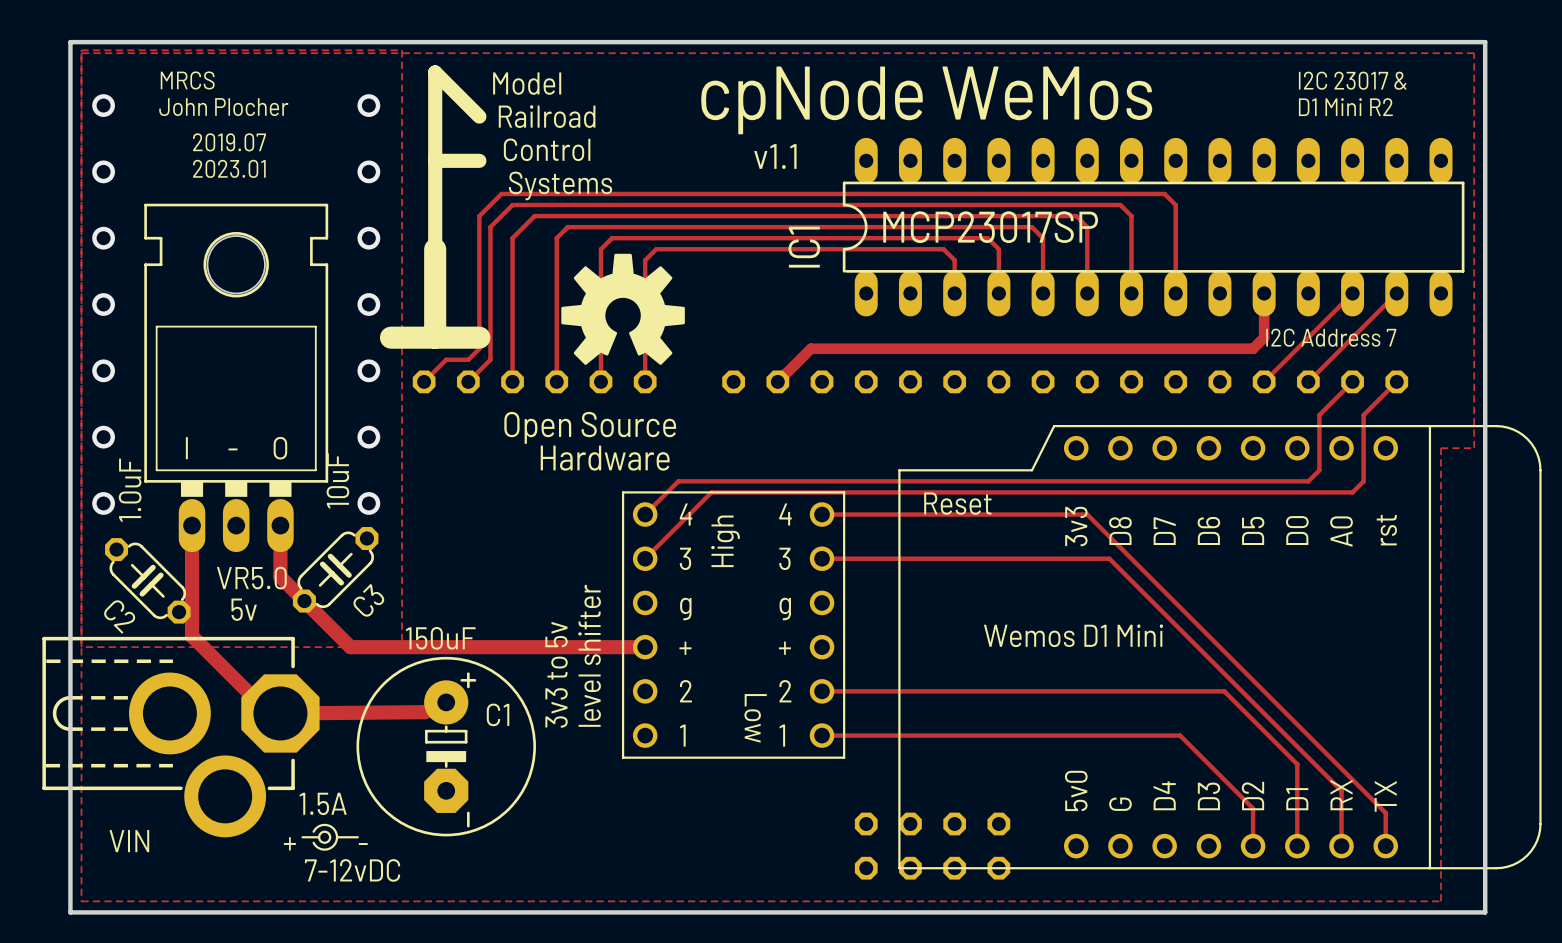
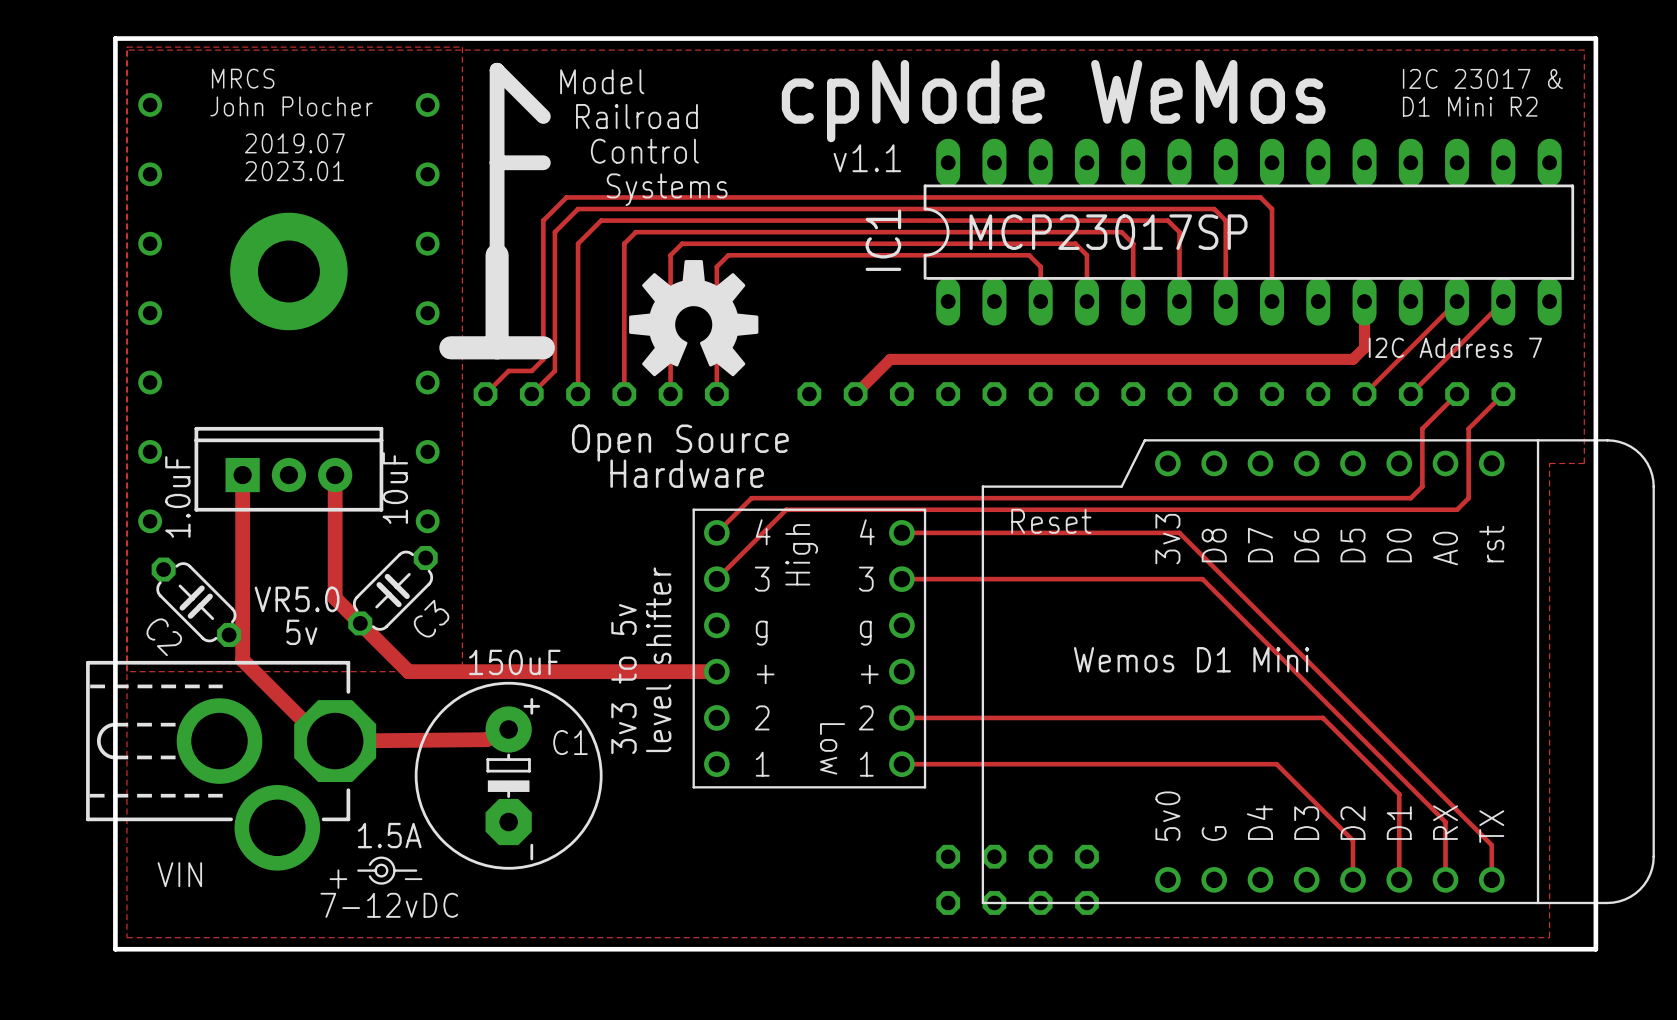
VR5.0 footprint: [144, 203, 329, 553] -> [194, 426, 384, 512]
via: none -> (288, 271)
track: none -> (242, 475) (242, 544)
track: none -> (335, 475) (335, 544)

